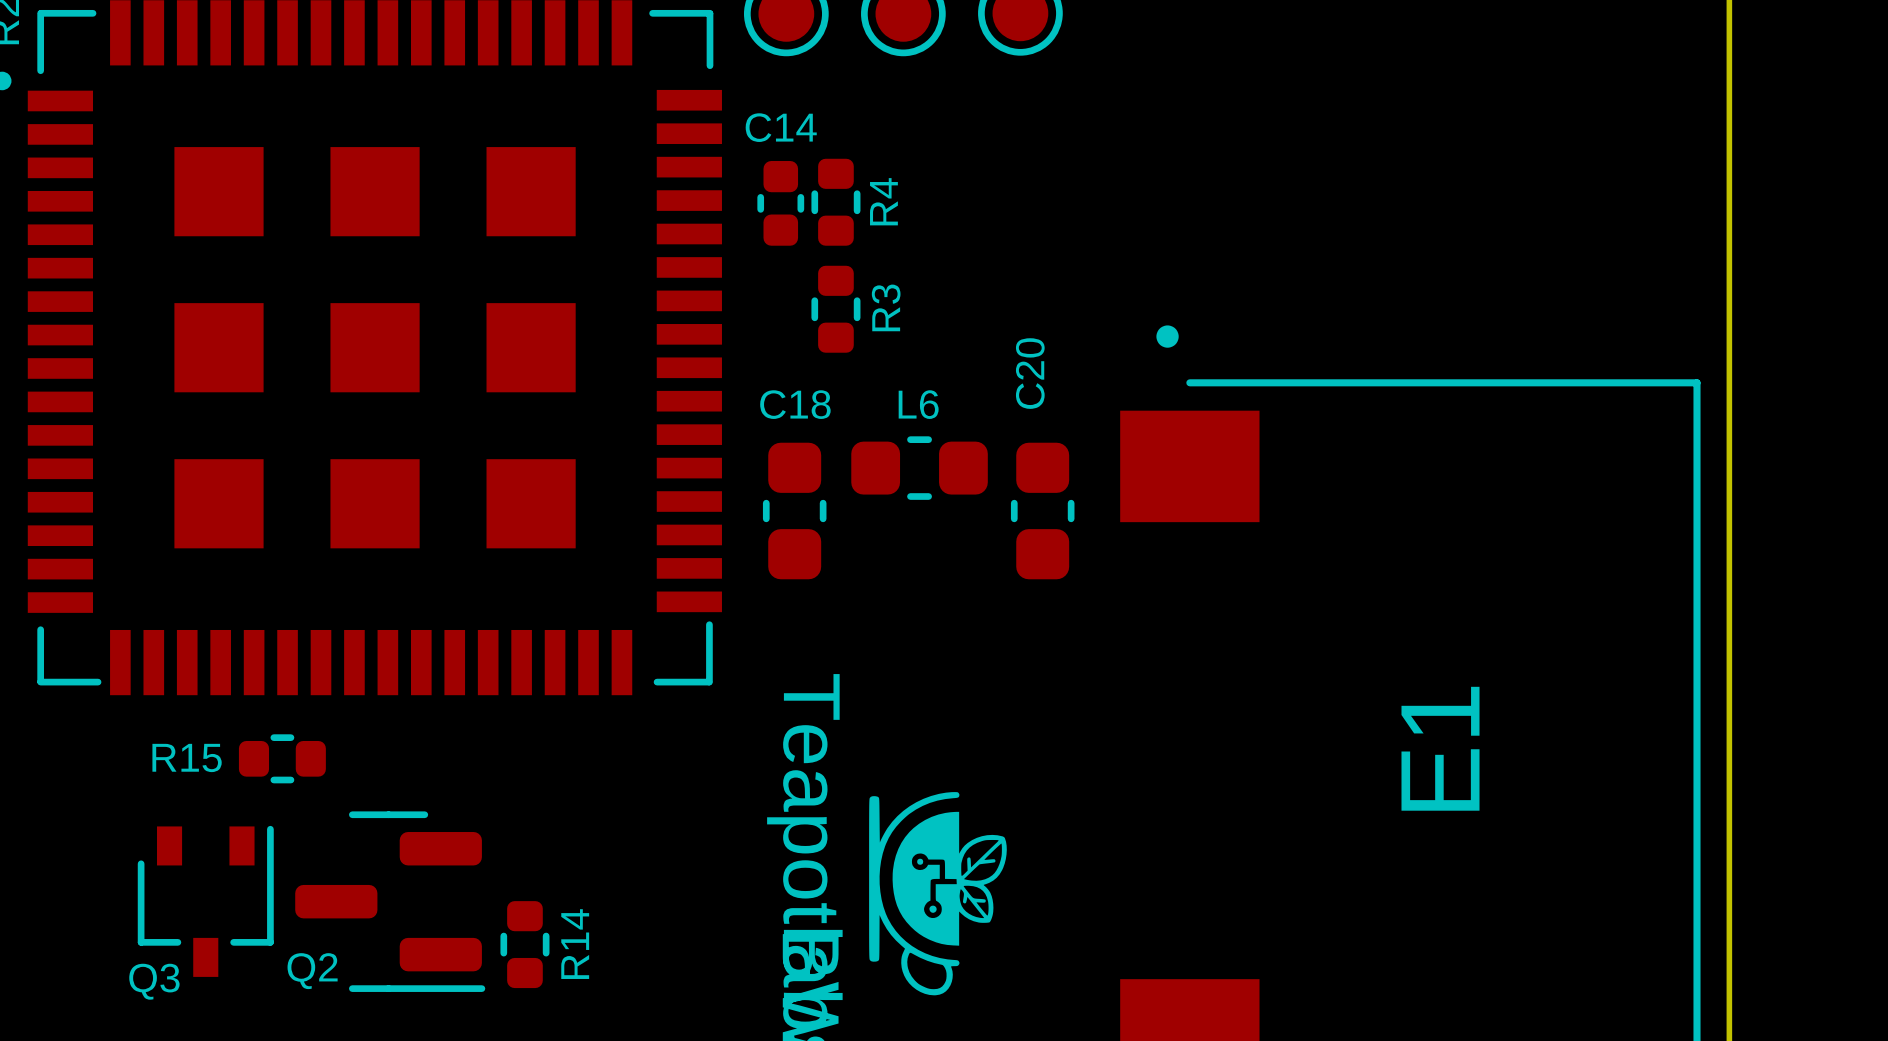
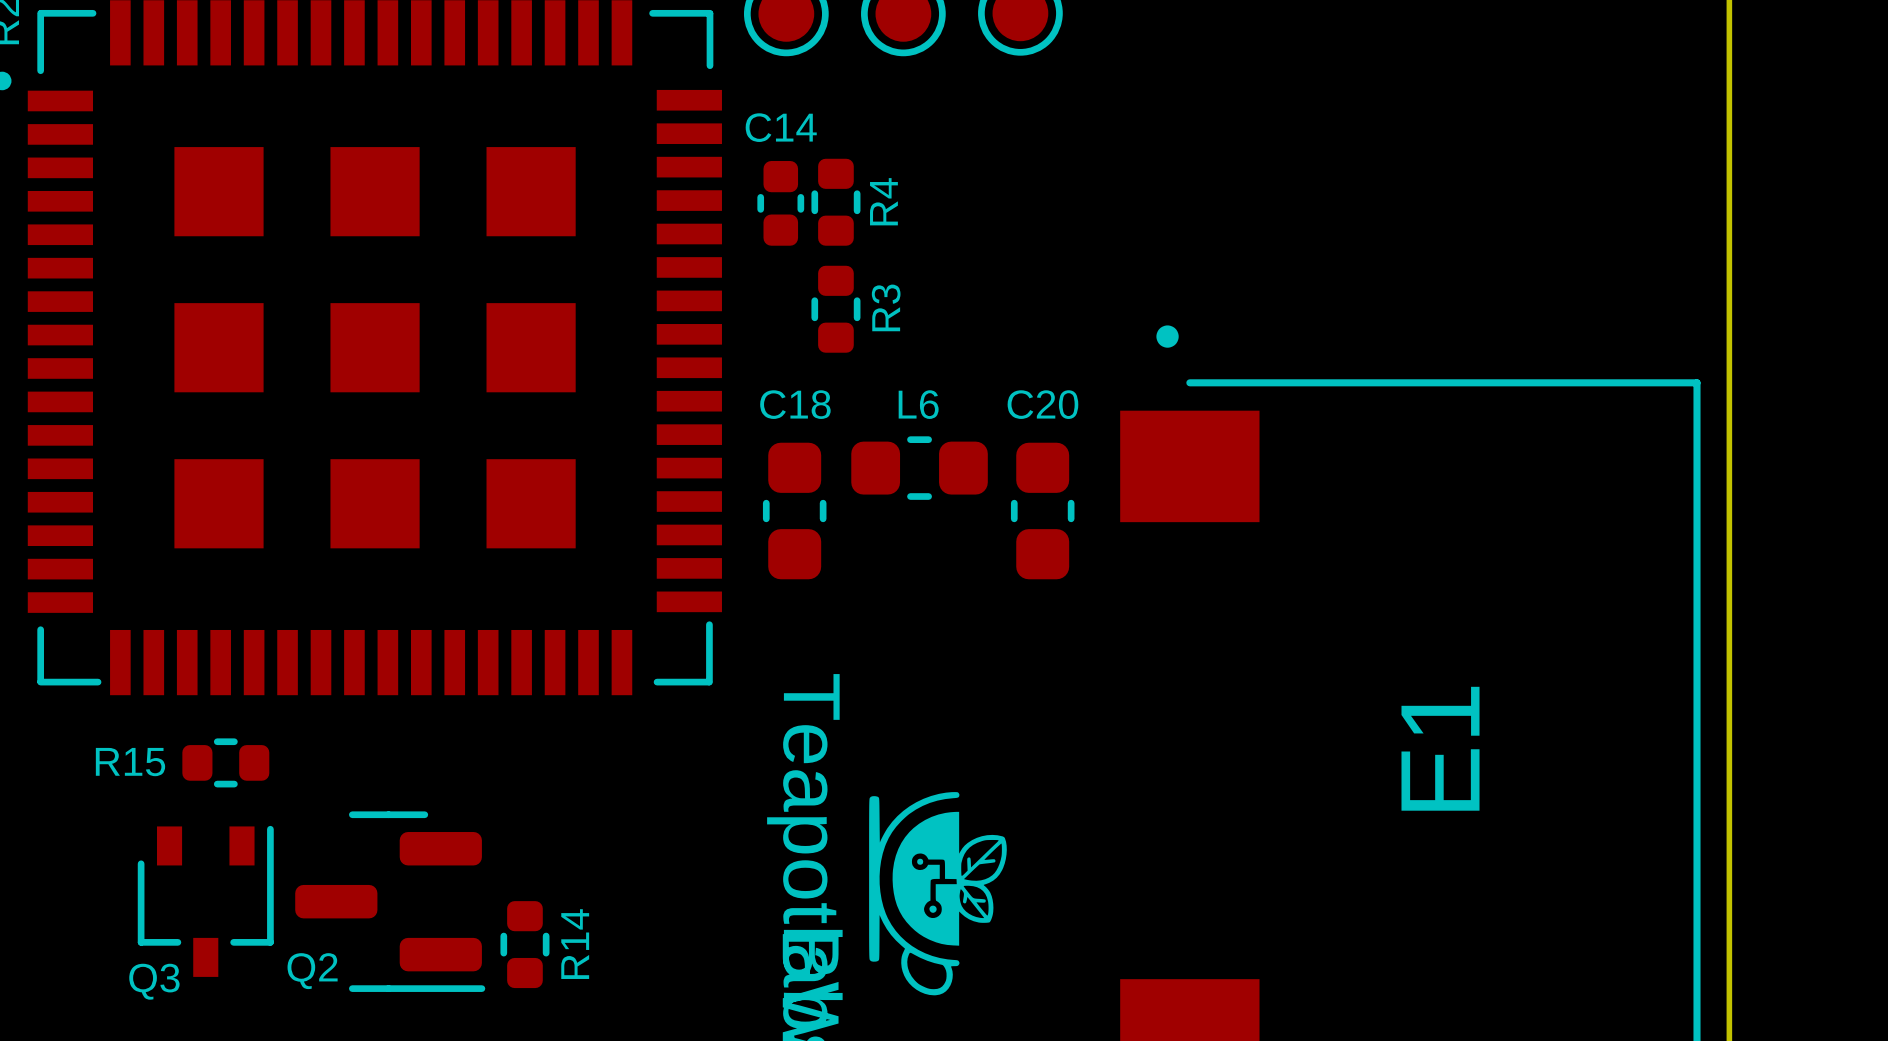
C20 name rotation: 0° (1030, 373) -> 90° clockwise (1042, 404)
R15 position: (282, 758) -> (225, 762)

